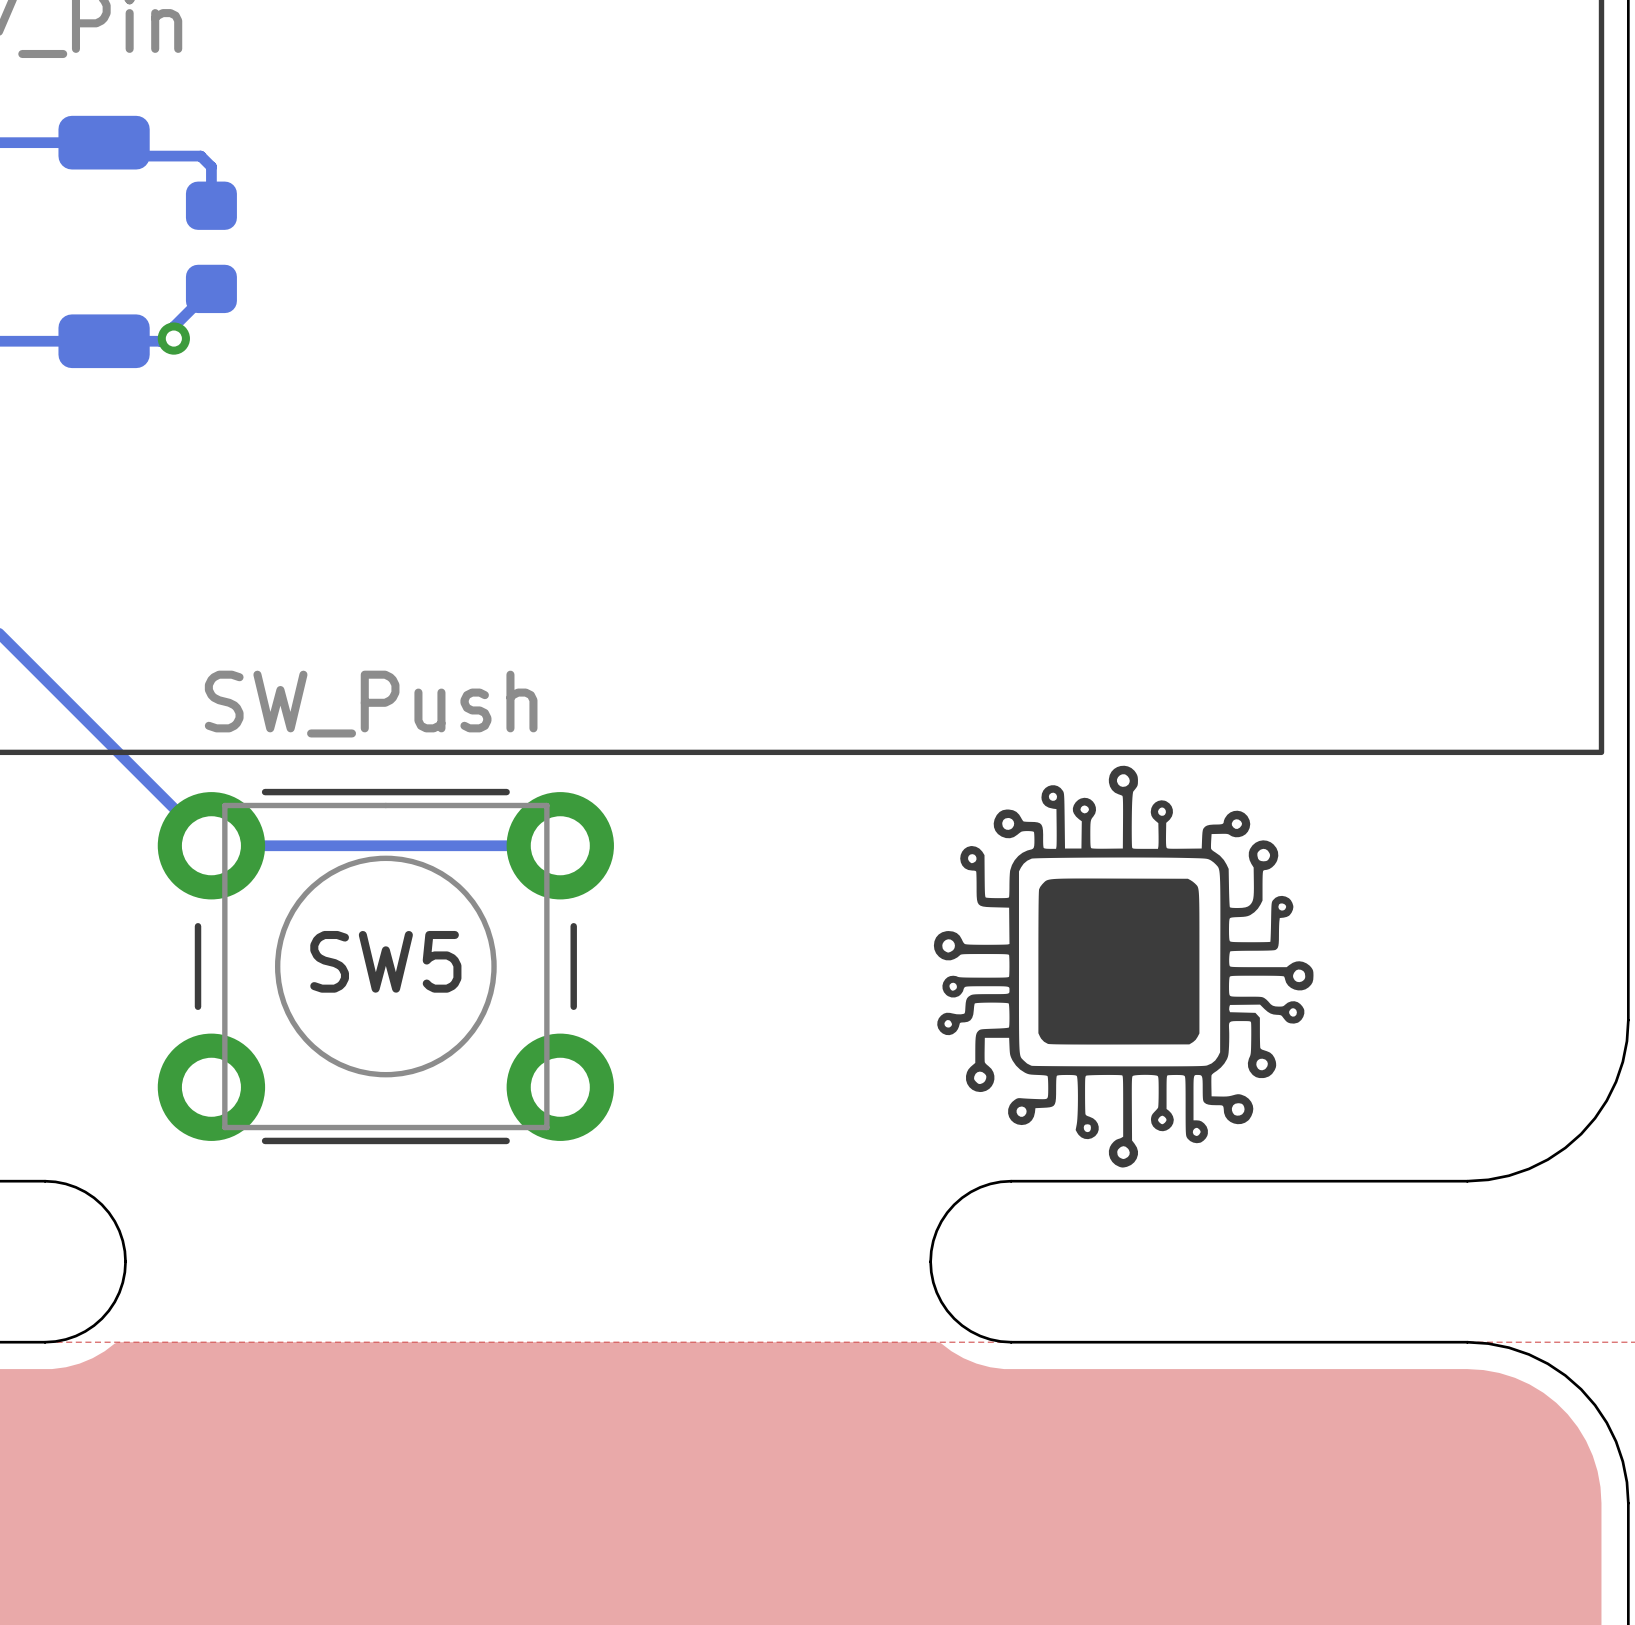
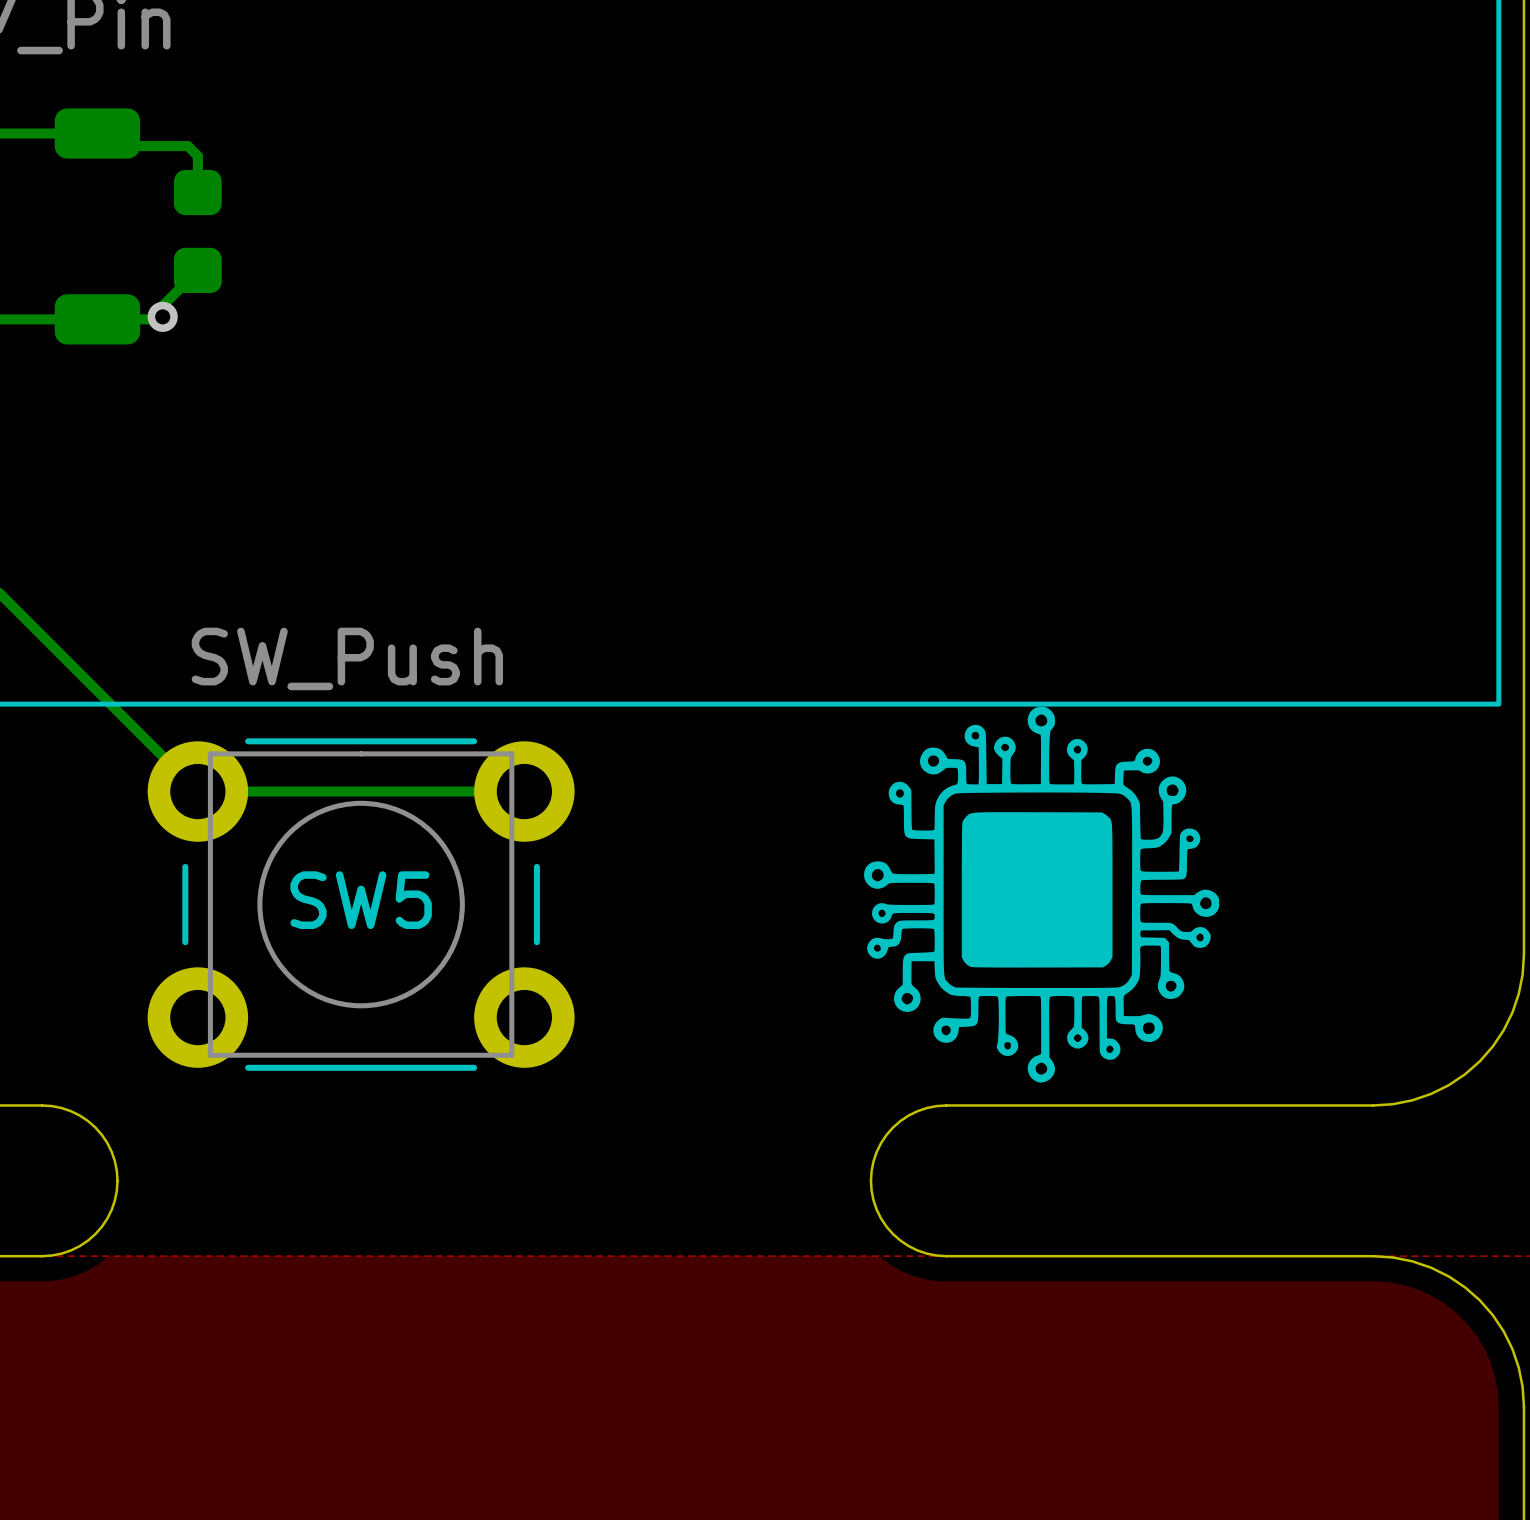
drawing position: (1123, 966) -> (1041, 894)

